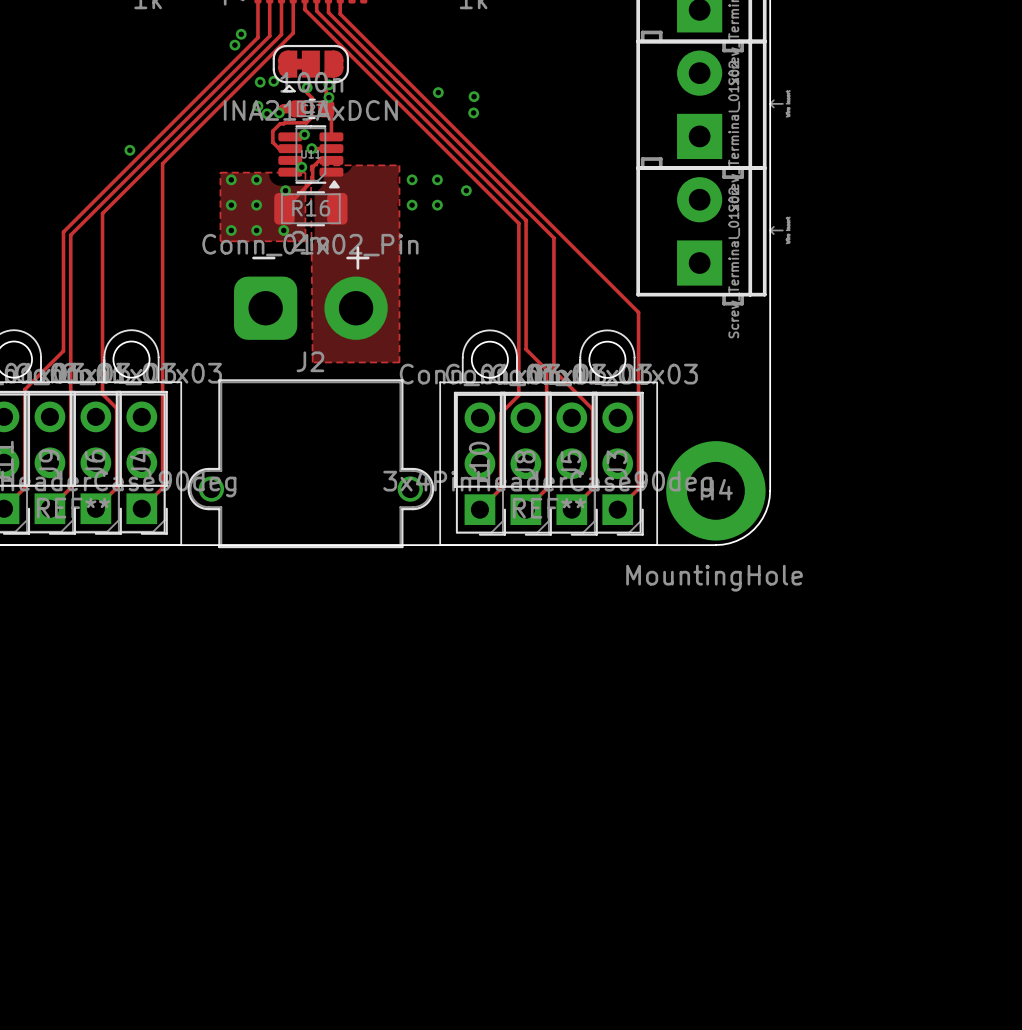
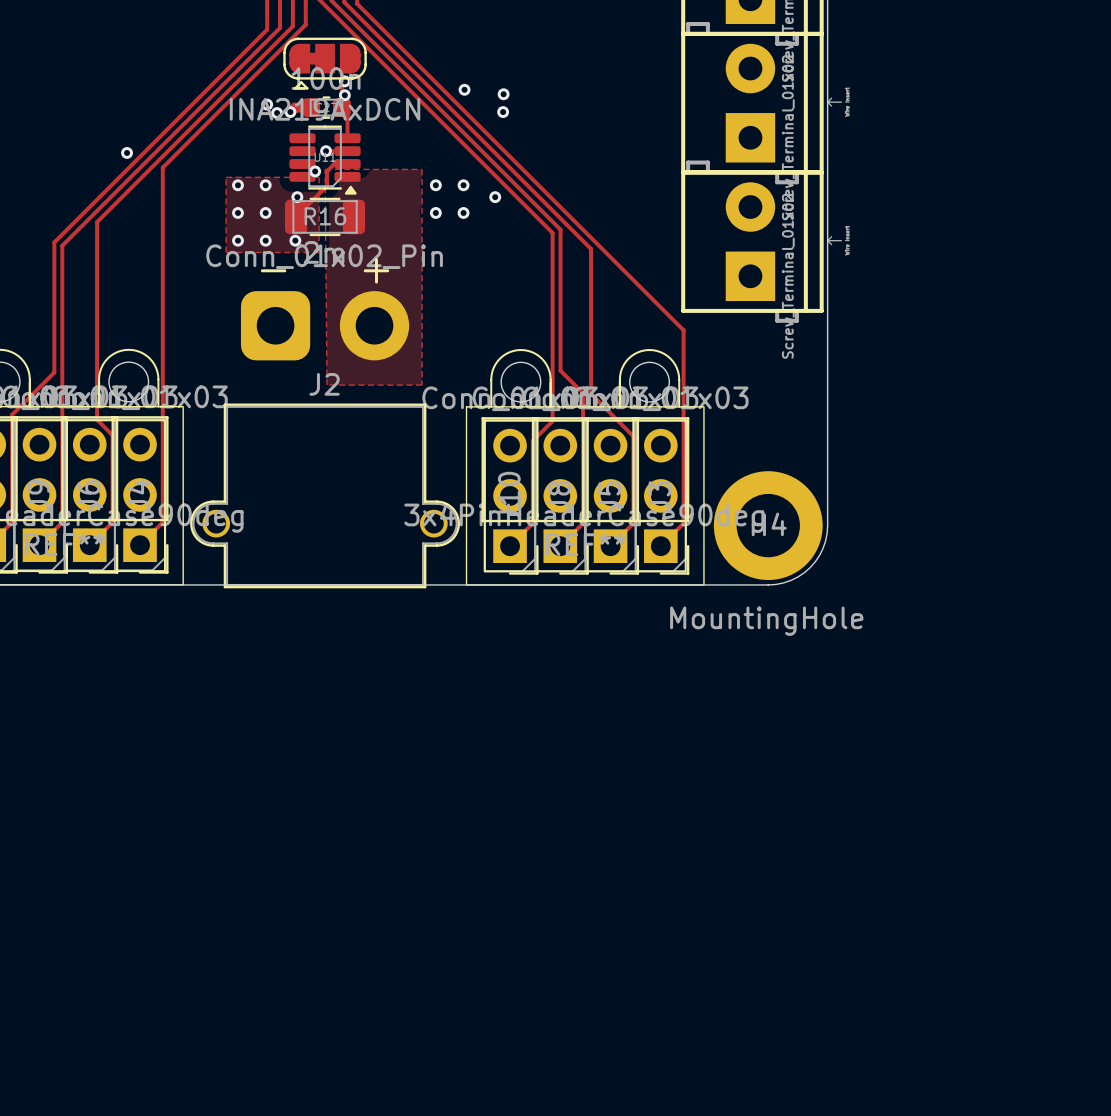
via: (241, 34) -> none
via: (234, 45) -> none
via: (273, 81) -> none
via: (260, 82) -> none
track: (307, 87) (307, 93) (311, 97) (311, 117) (306, 122) (280, 123) (272, 131) (272, 142) (279, 148) (290, 148) -> none
via: (307, 87) -> none
via: (304, 134) -> none

